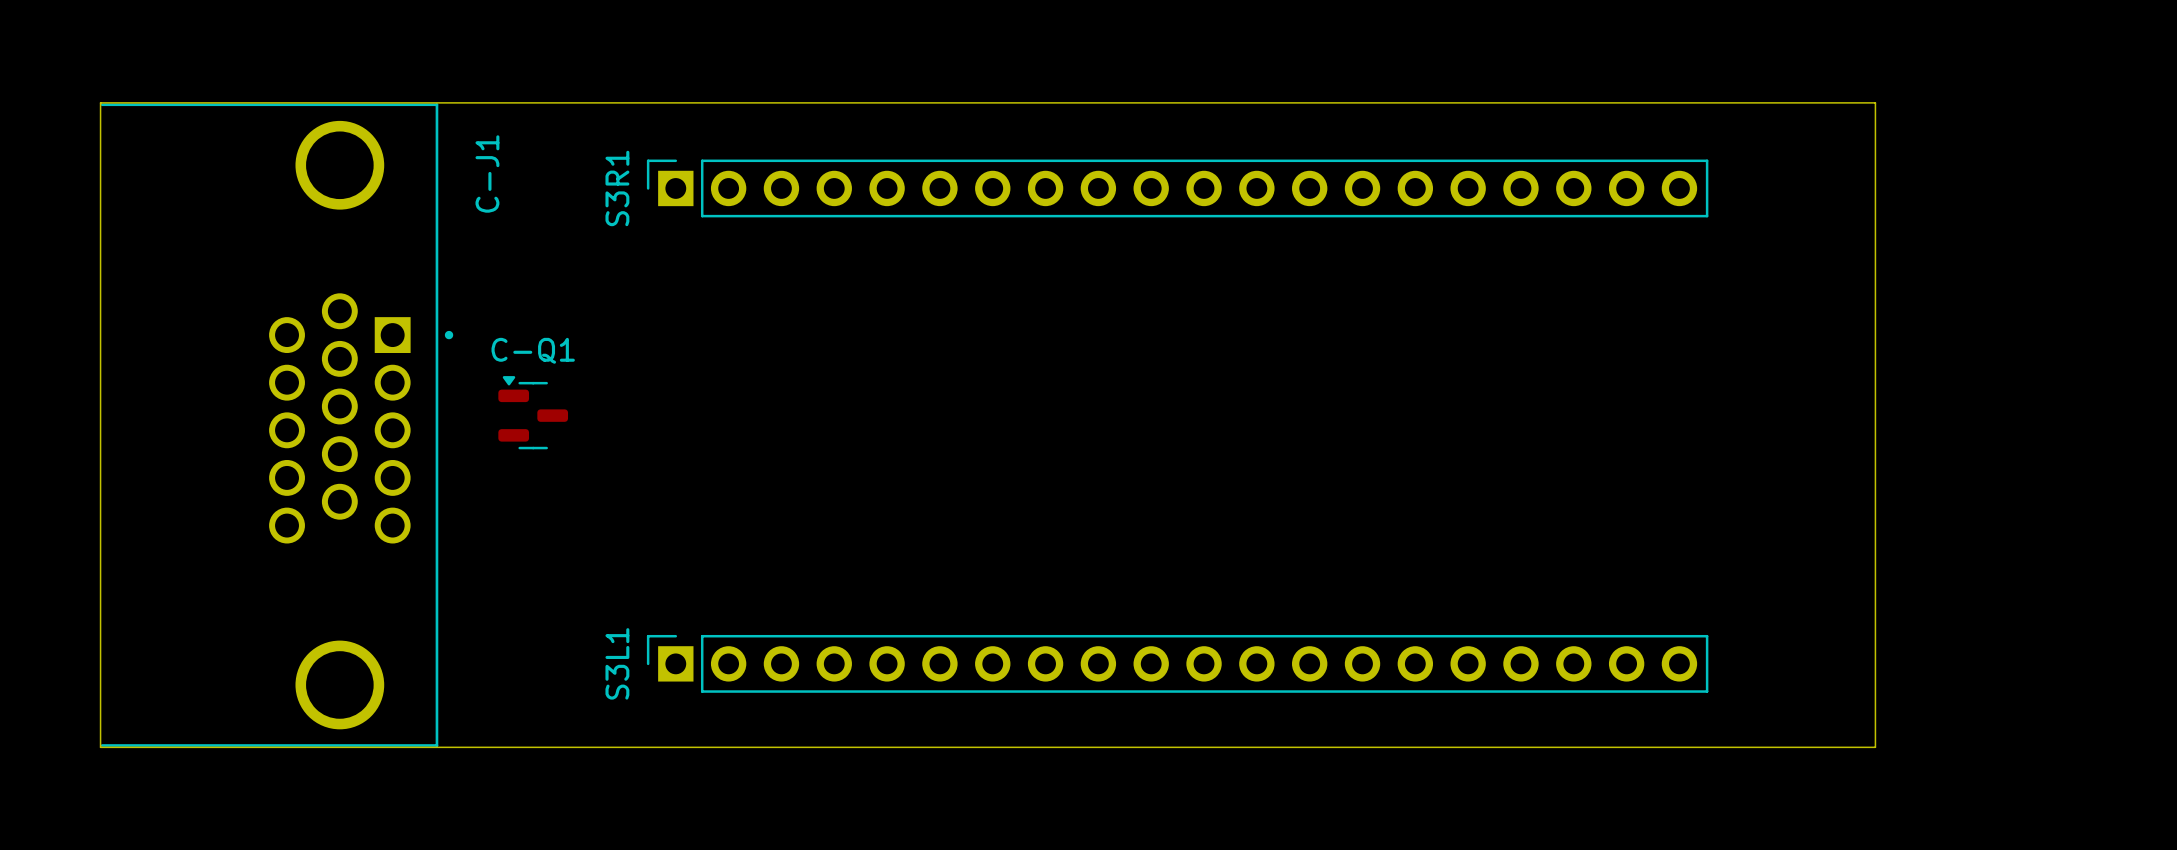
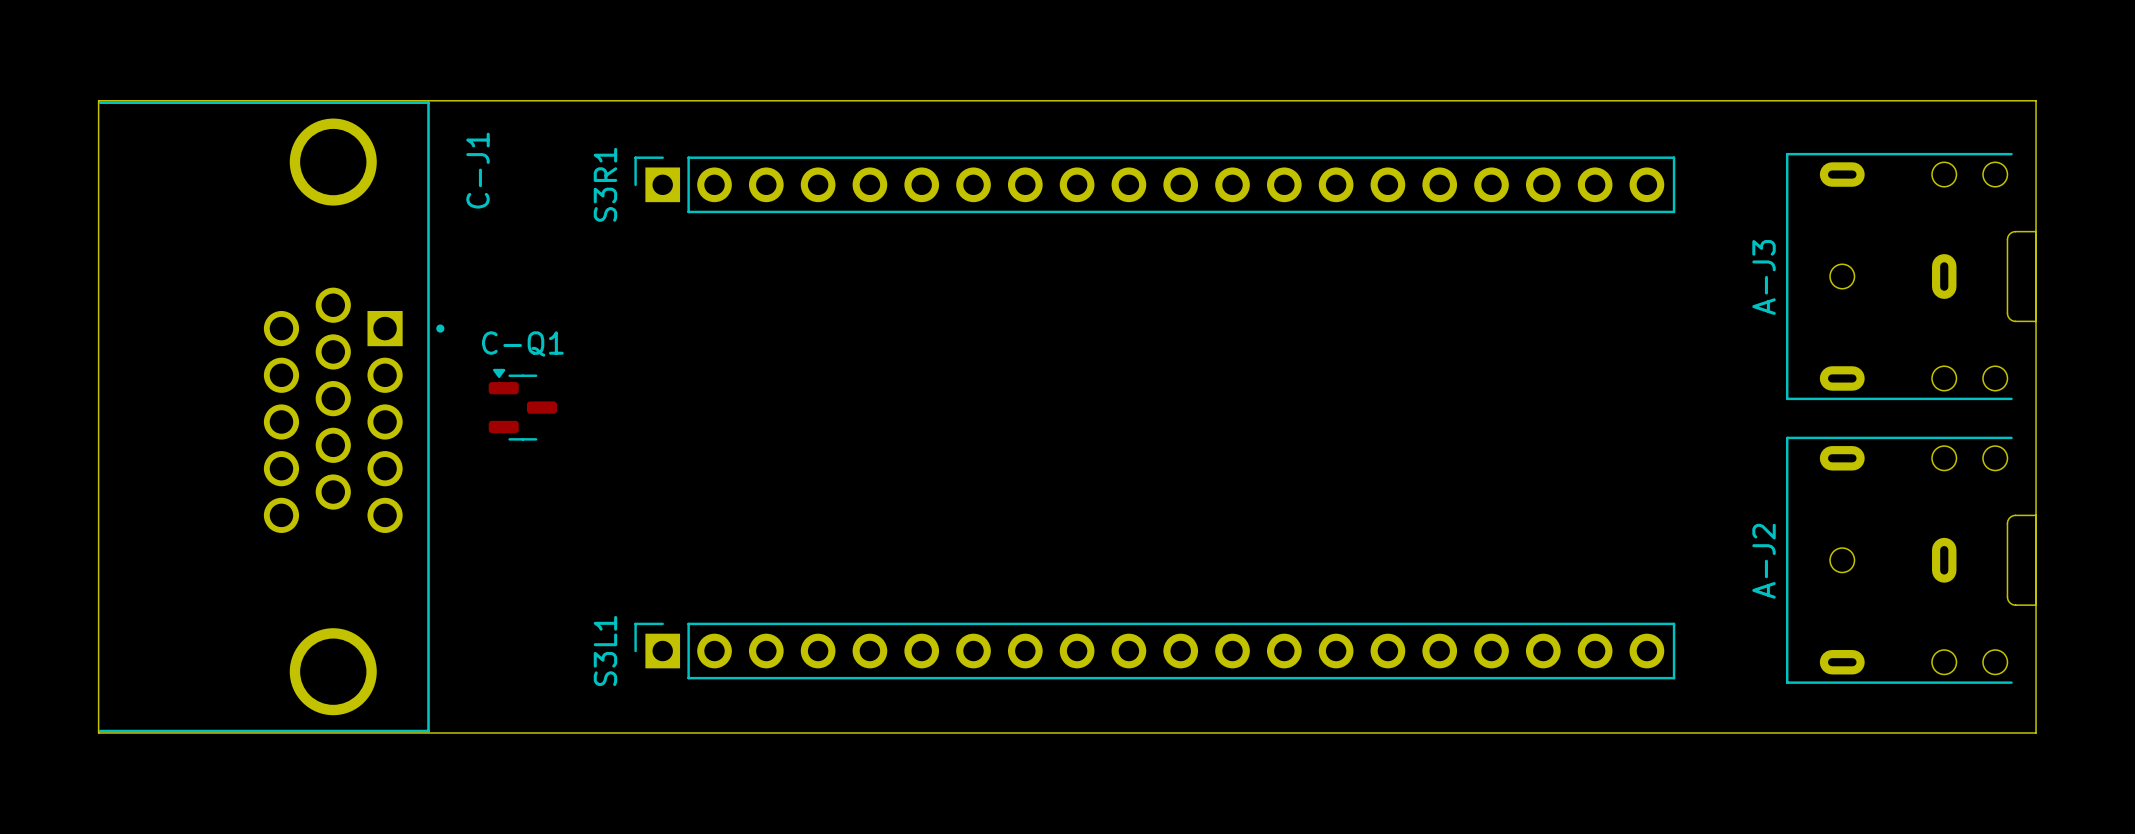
board edge: (100, 102) (1875, 102) (1875, 747) (100, 747) -> (98, 100) (2036, 100) (2036, 732) (98, 732)
A-J3: none -> (1911, 276)
A-J2: none -> (1911, 560)

